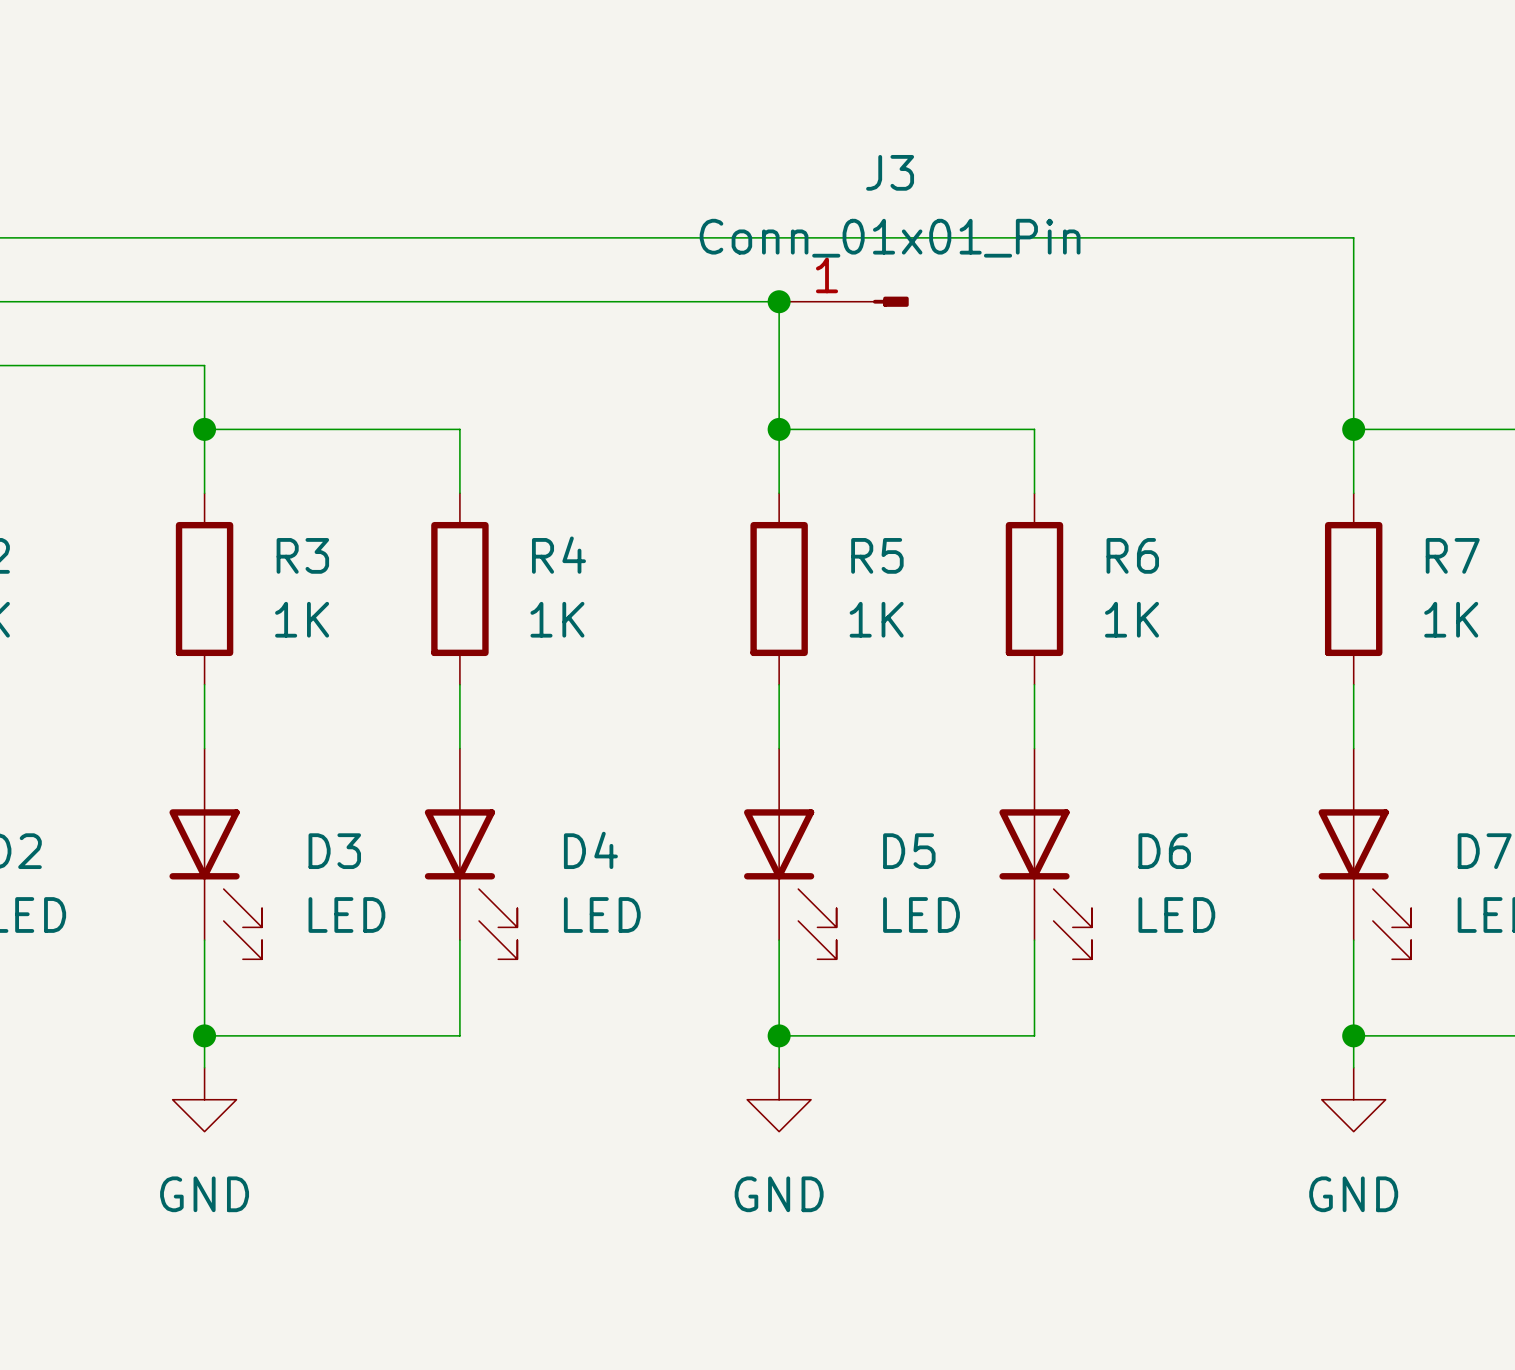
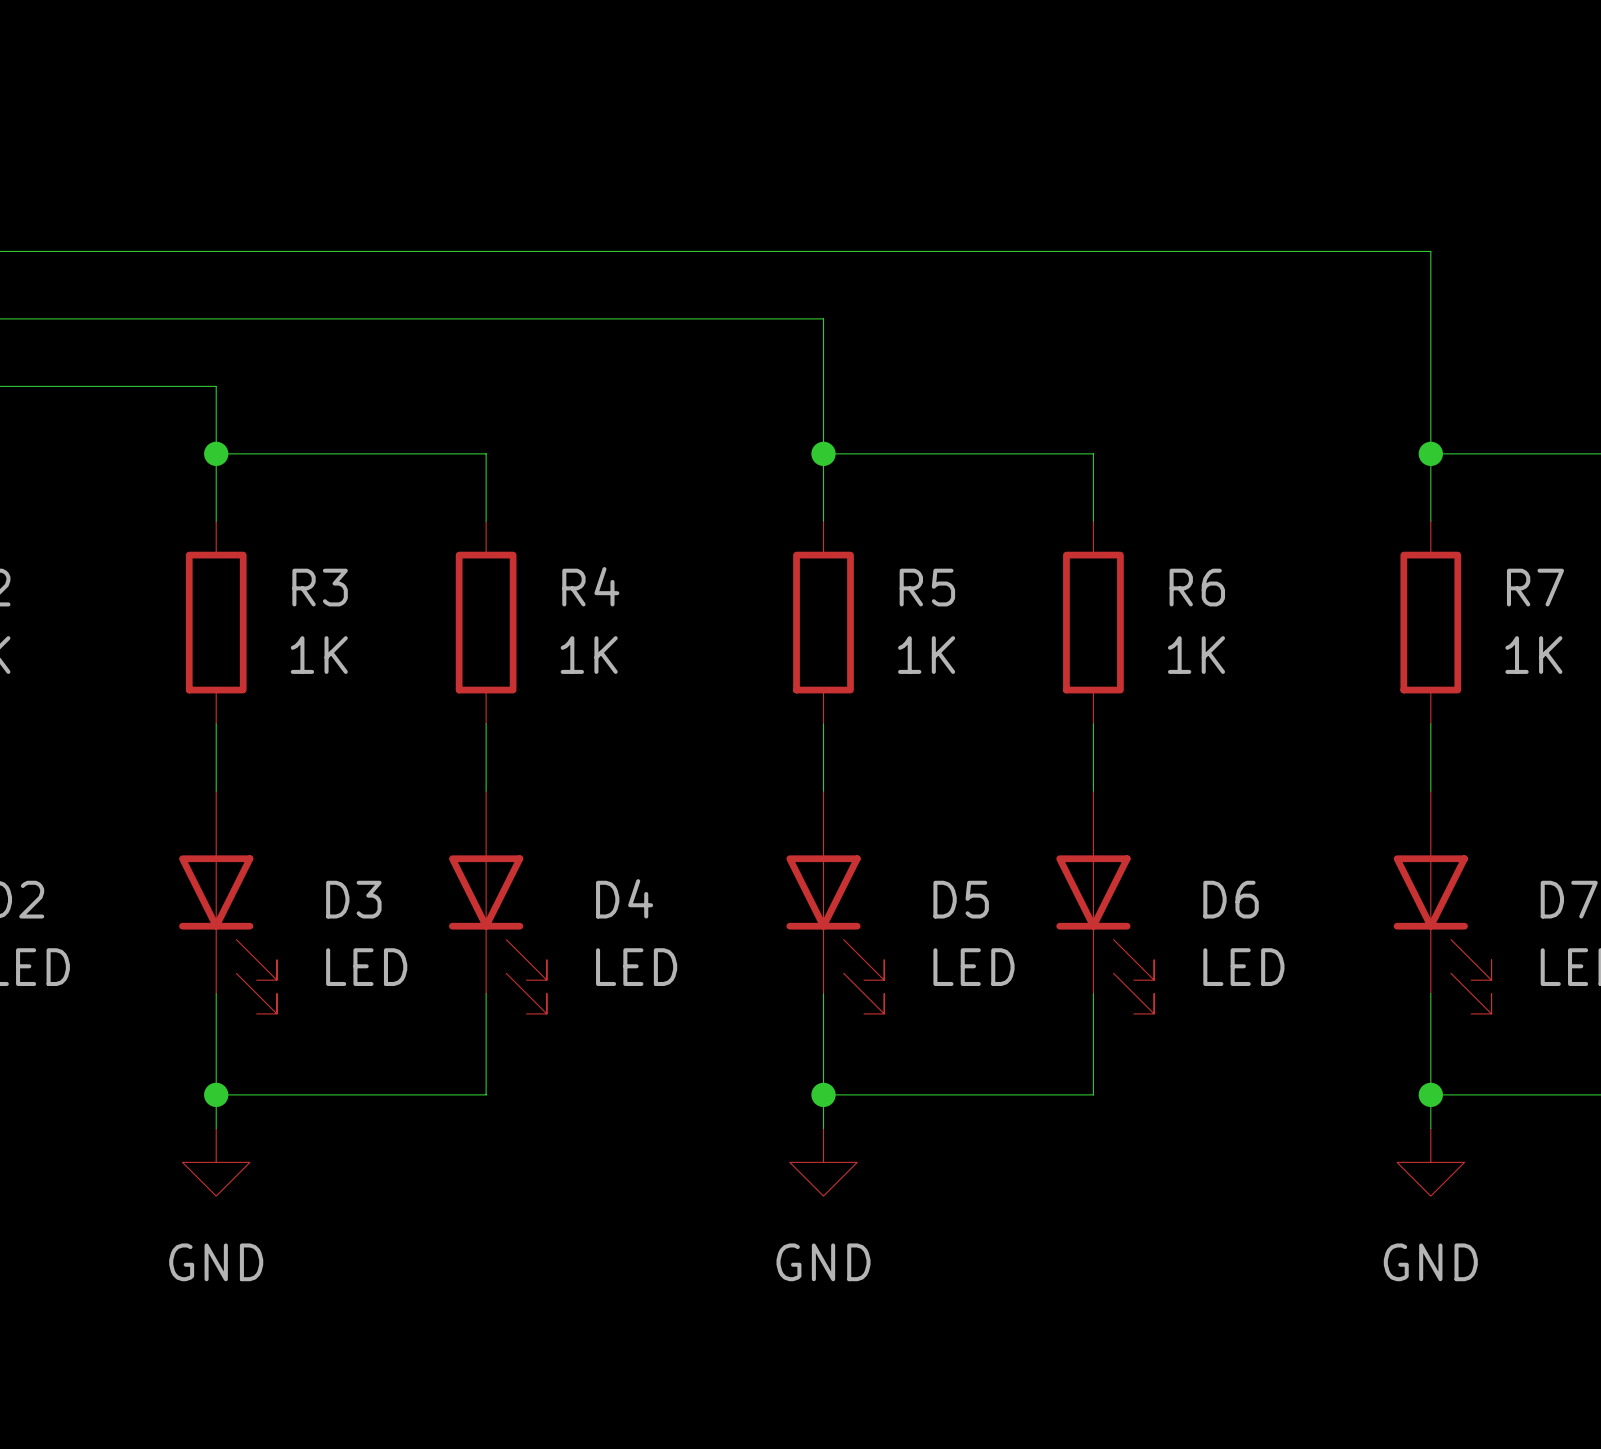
junction: (779, 301) -> none
J3: Conn_01x01_Pin (843, 301) -> none

